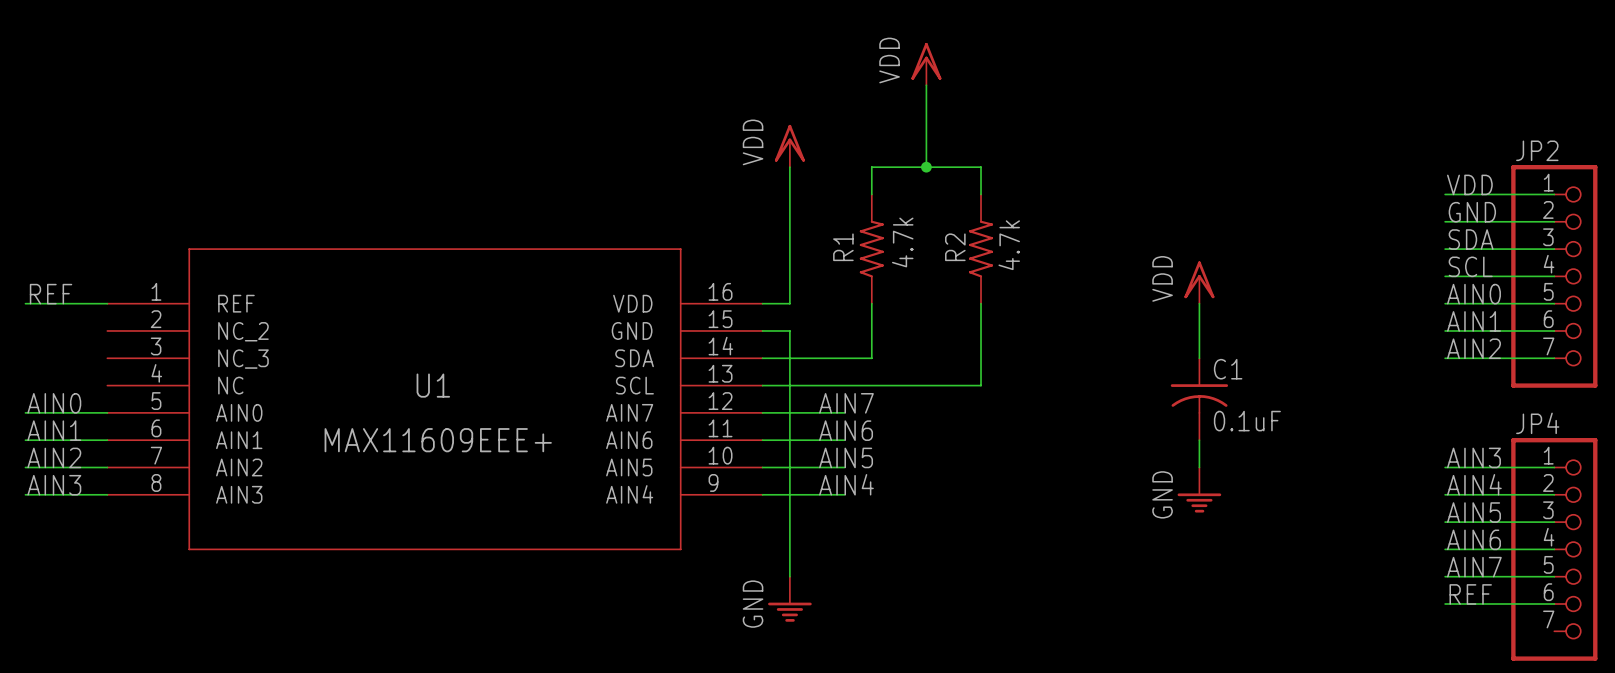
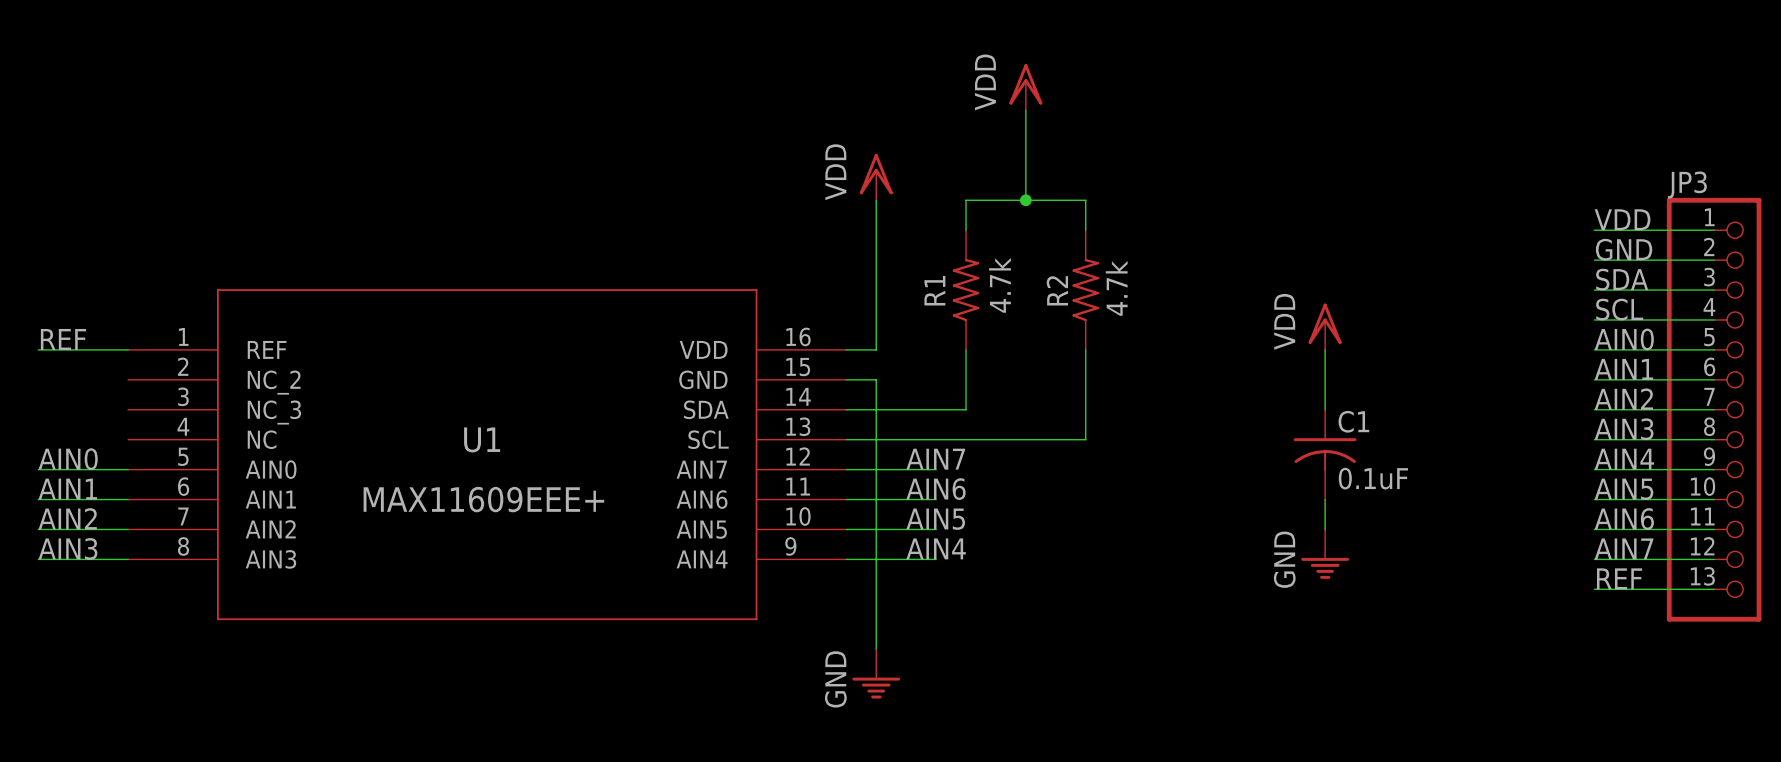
JP2: (1554, 276) -> none
JP3: none -> (1714, 409)
label: none -> AIN3 (1624, 429)
label: none -> AIN4 (1624, 459)
label: none -> AIN5 (1623, 489)
label: AIN3 (1473, 457) -> AIN6 (1624, 519)
label: AIN4 (1474, 484) -> AIN7 (1623, 548)
label: AIN5 (1473, 512) -> REF (1619, 578)
label: AIN6 (1473, 539) -> none
wire: (1445, 549) (1554, 549) -> (1594, 439) (1714, 439)
JP4: (1554, 549) -> none
label: AIN7 (1474, 567) -> none
wire: (1445, 576) (1554, 576) -> (1594, 469) (1714, 469)
label: REF (1470, 594) -> none
wire: (1445, 604) (1554, 604) -> (1594, 499) (1714, 499)

